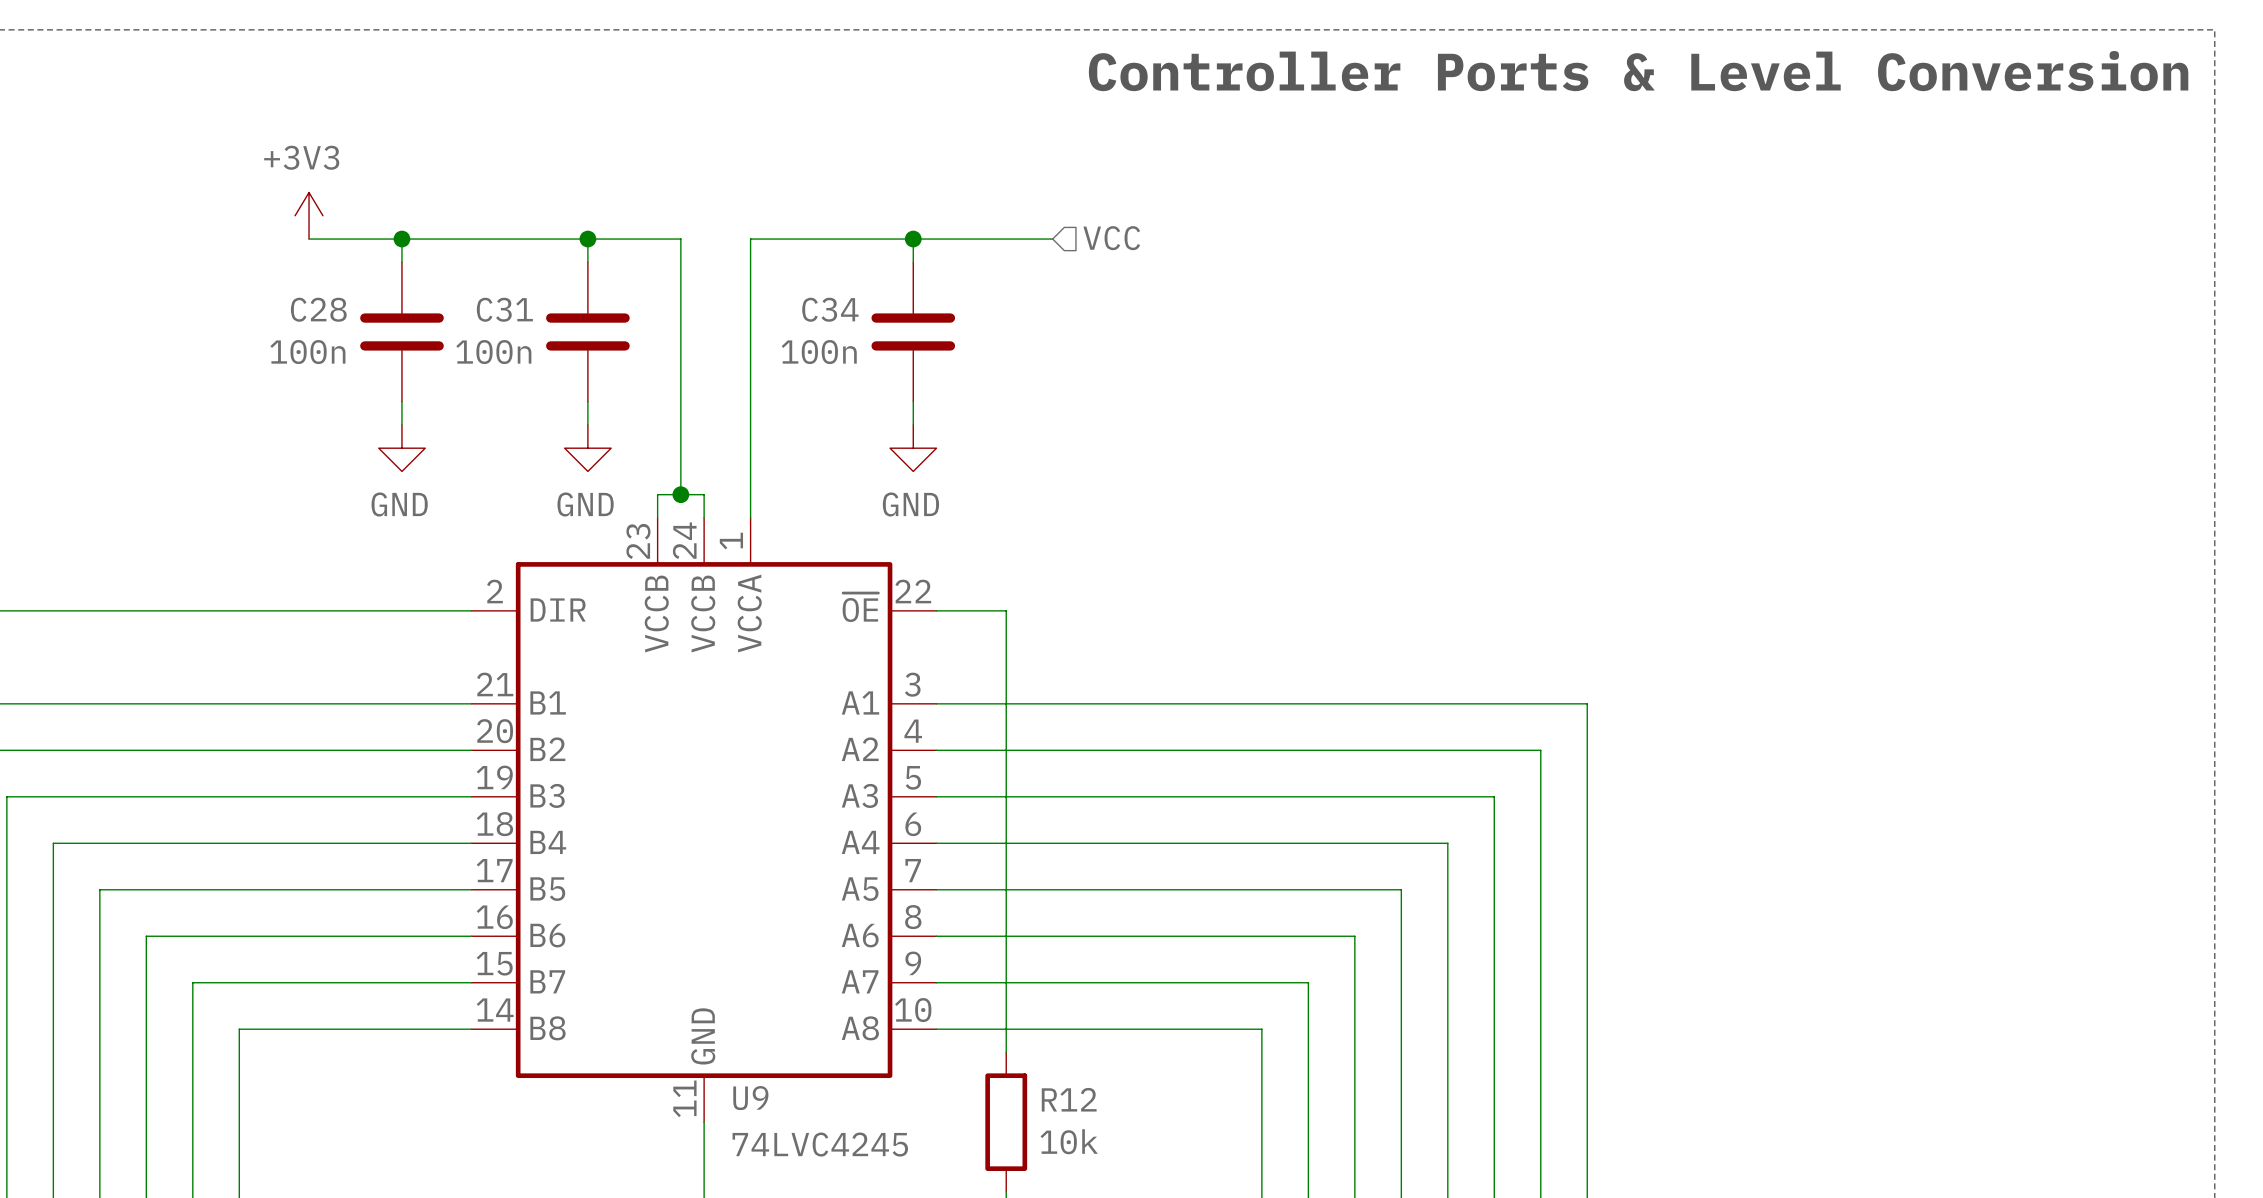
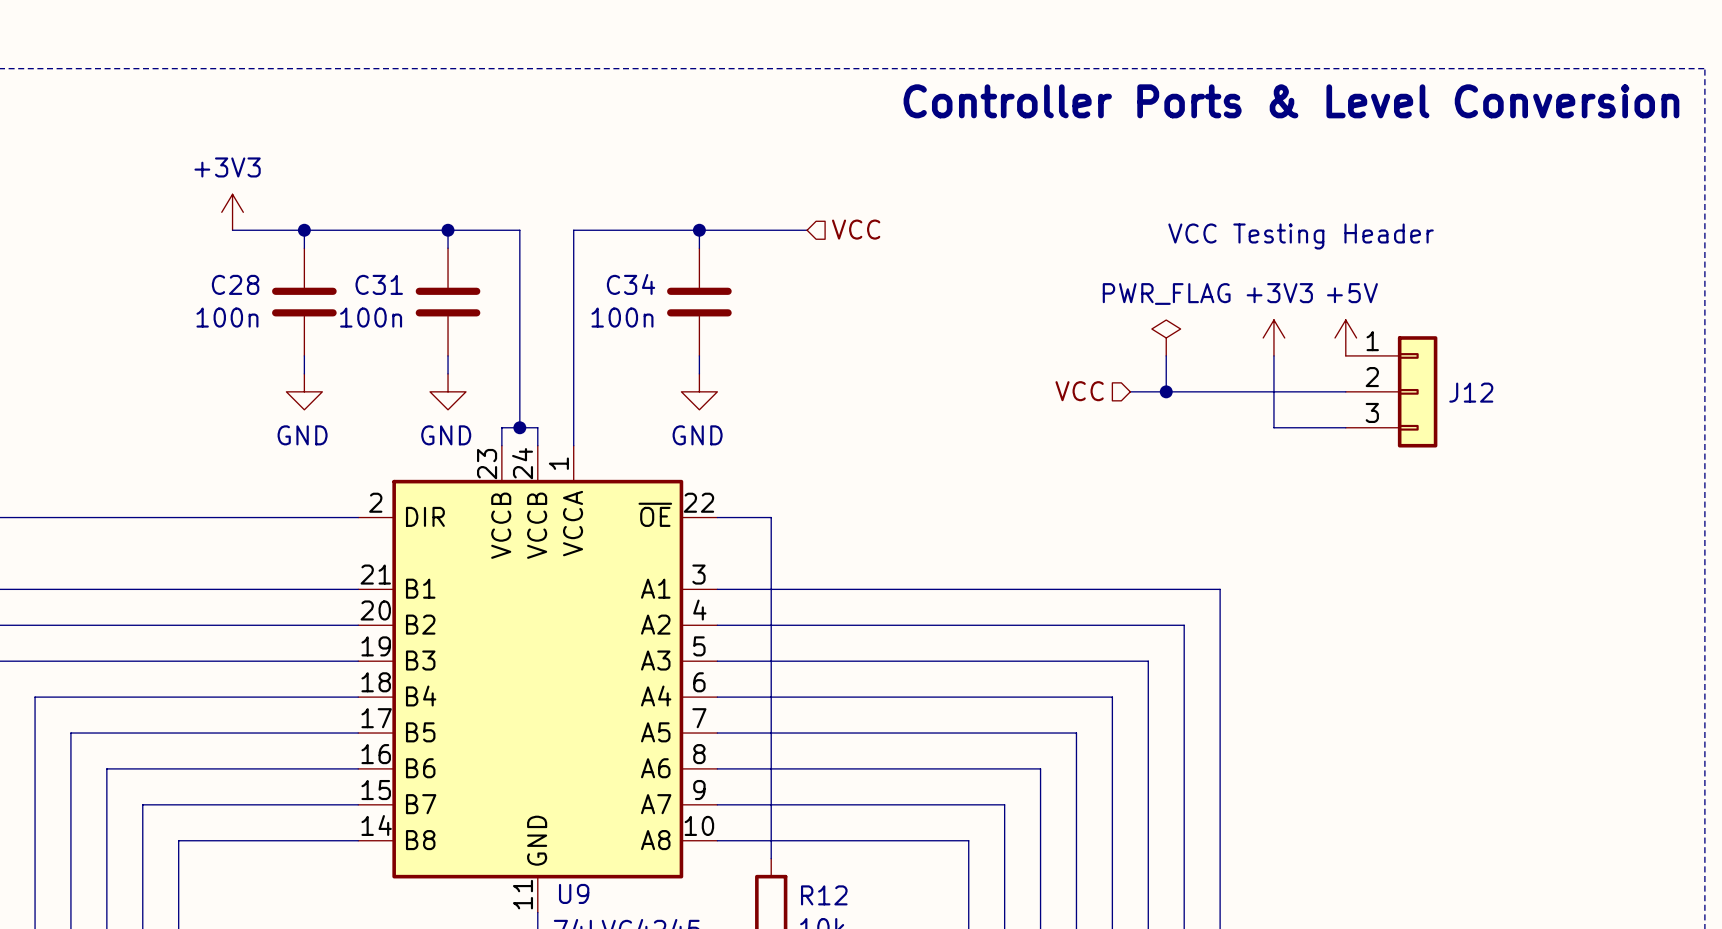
text: none -> VCC Testing Header (1301, 236)
power symbol: none -> PWR_FLAG (1166, 337)
power symbol: none -> +3V3 (1273, 337)
power symbol: none -> +5V (1345, 337)
wire: none -> (1166, 355) (1166, 391)
wire: none -> (1273, 355) (1273, 427) (1345, 427)
hierarchical label: none -> VCC (1079, 391)
wire: none -> (1130, 391) (1345, 391)
junction: none -> (1166, 391)
J12: none -> (1391, 391)

